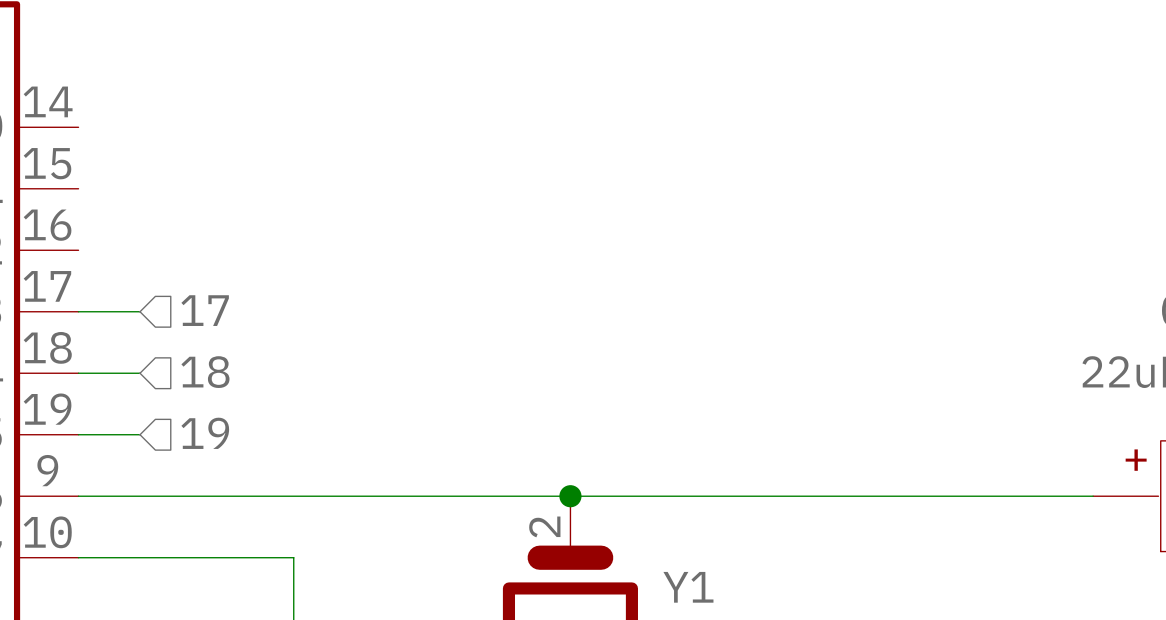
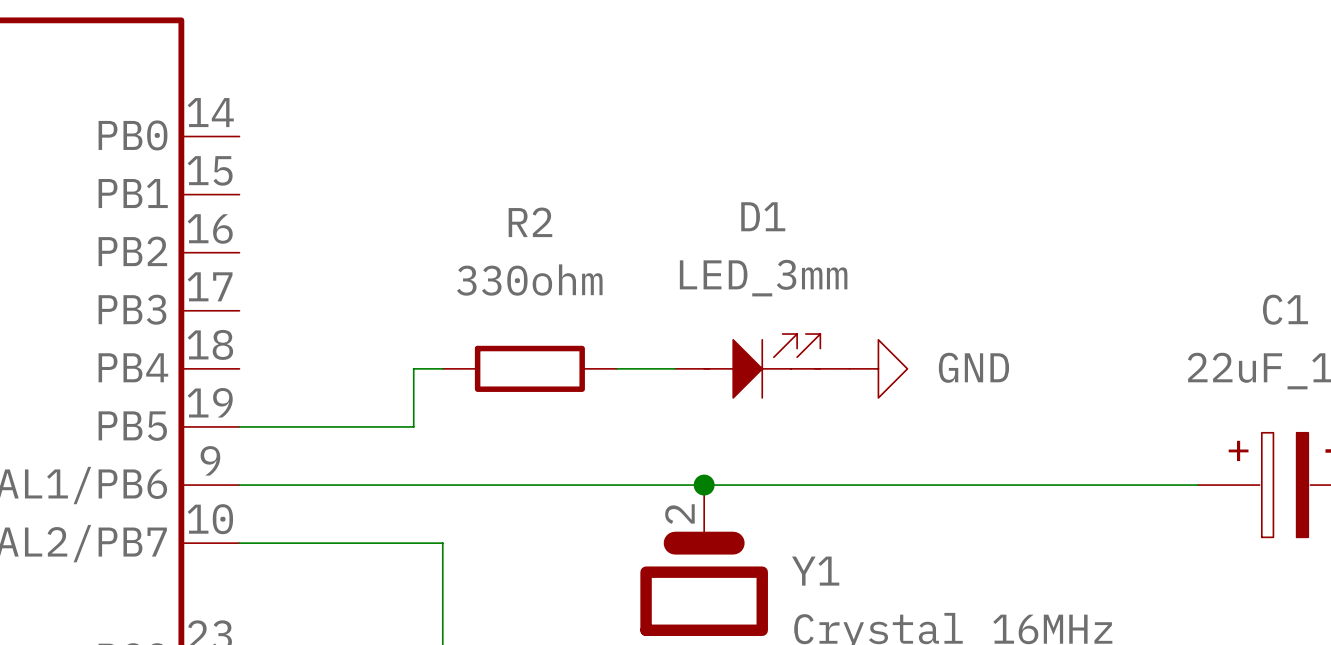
hierarchical label: 17 (205, 310) -> none
wire: (78, 311) (140, 311) -> none
D1: none -> LED_3mm (762, 365)
hierarchical label: 18 (205, 372) -> none
wire: (78, 373) (140, 373) -> (617, 368) (675, 368)
wire: none -> (442, 368) (413, 368) (413, 426) (297, 426)
R2: none -> 330ohm (529, 368)
power symbol: none -> GND (878, 368)
hierarchical label: 19 (205, 433) -> none

